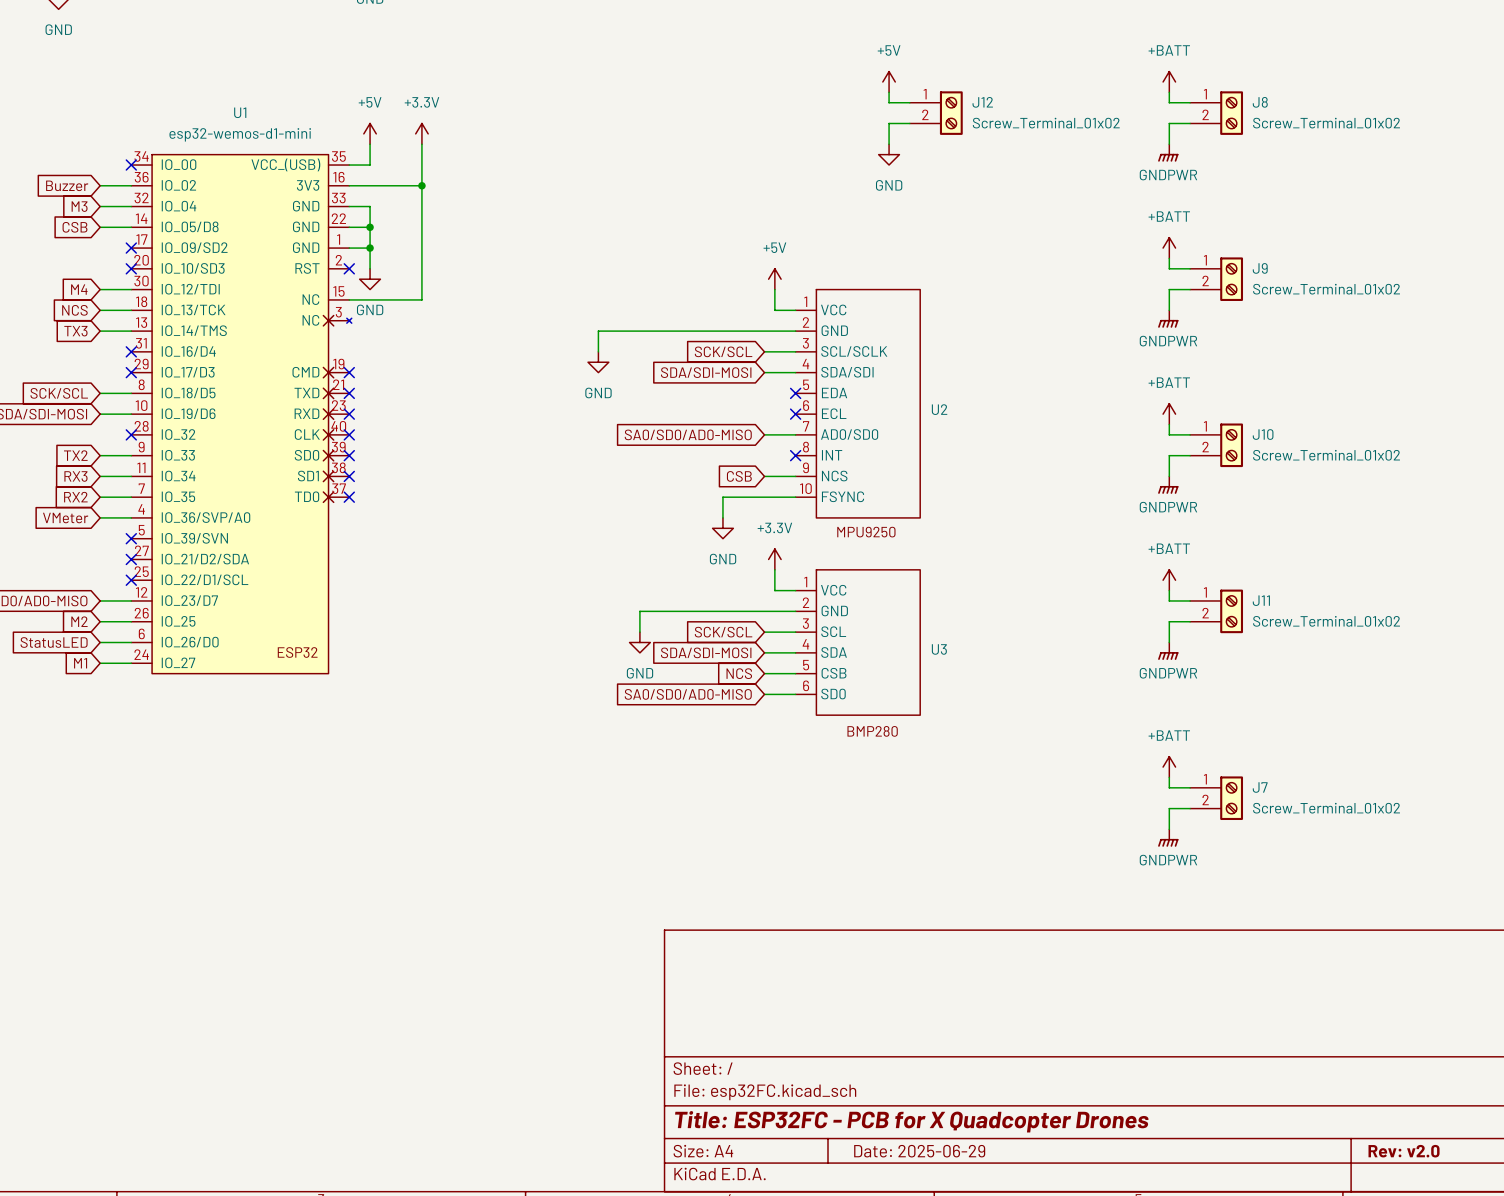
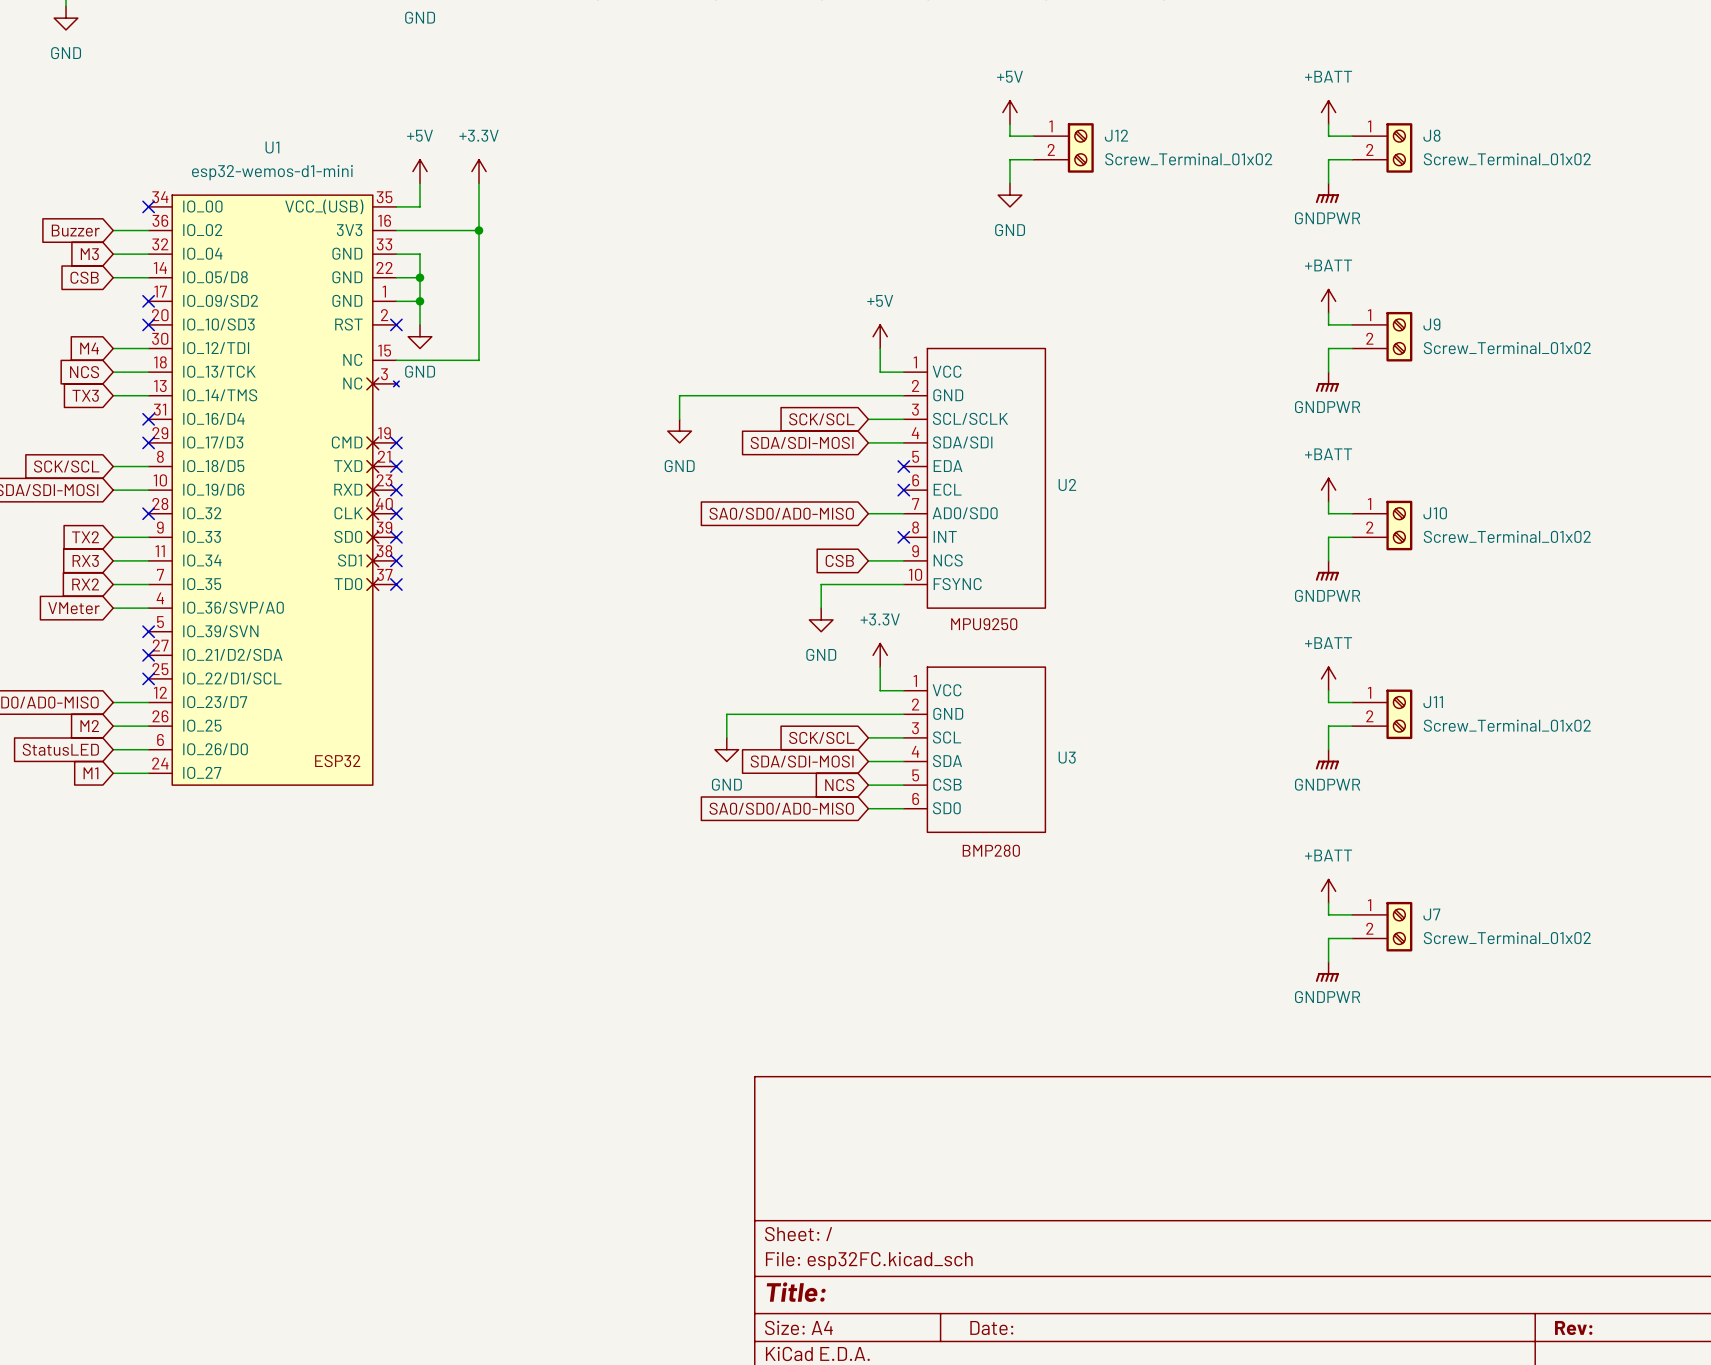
title block: Title: ESP32FC - PCB for X Quadcopter Drones (911, 1121) -> Title: (796, 1292)
title block: Date: 2025-06-29 (919, 1151) -> Date: (991, 1328)
title block: Rev: v2.0 (1404, 1151) -> Rev: (1573, 1328)

